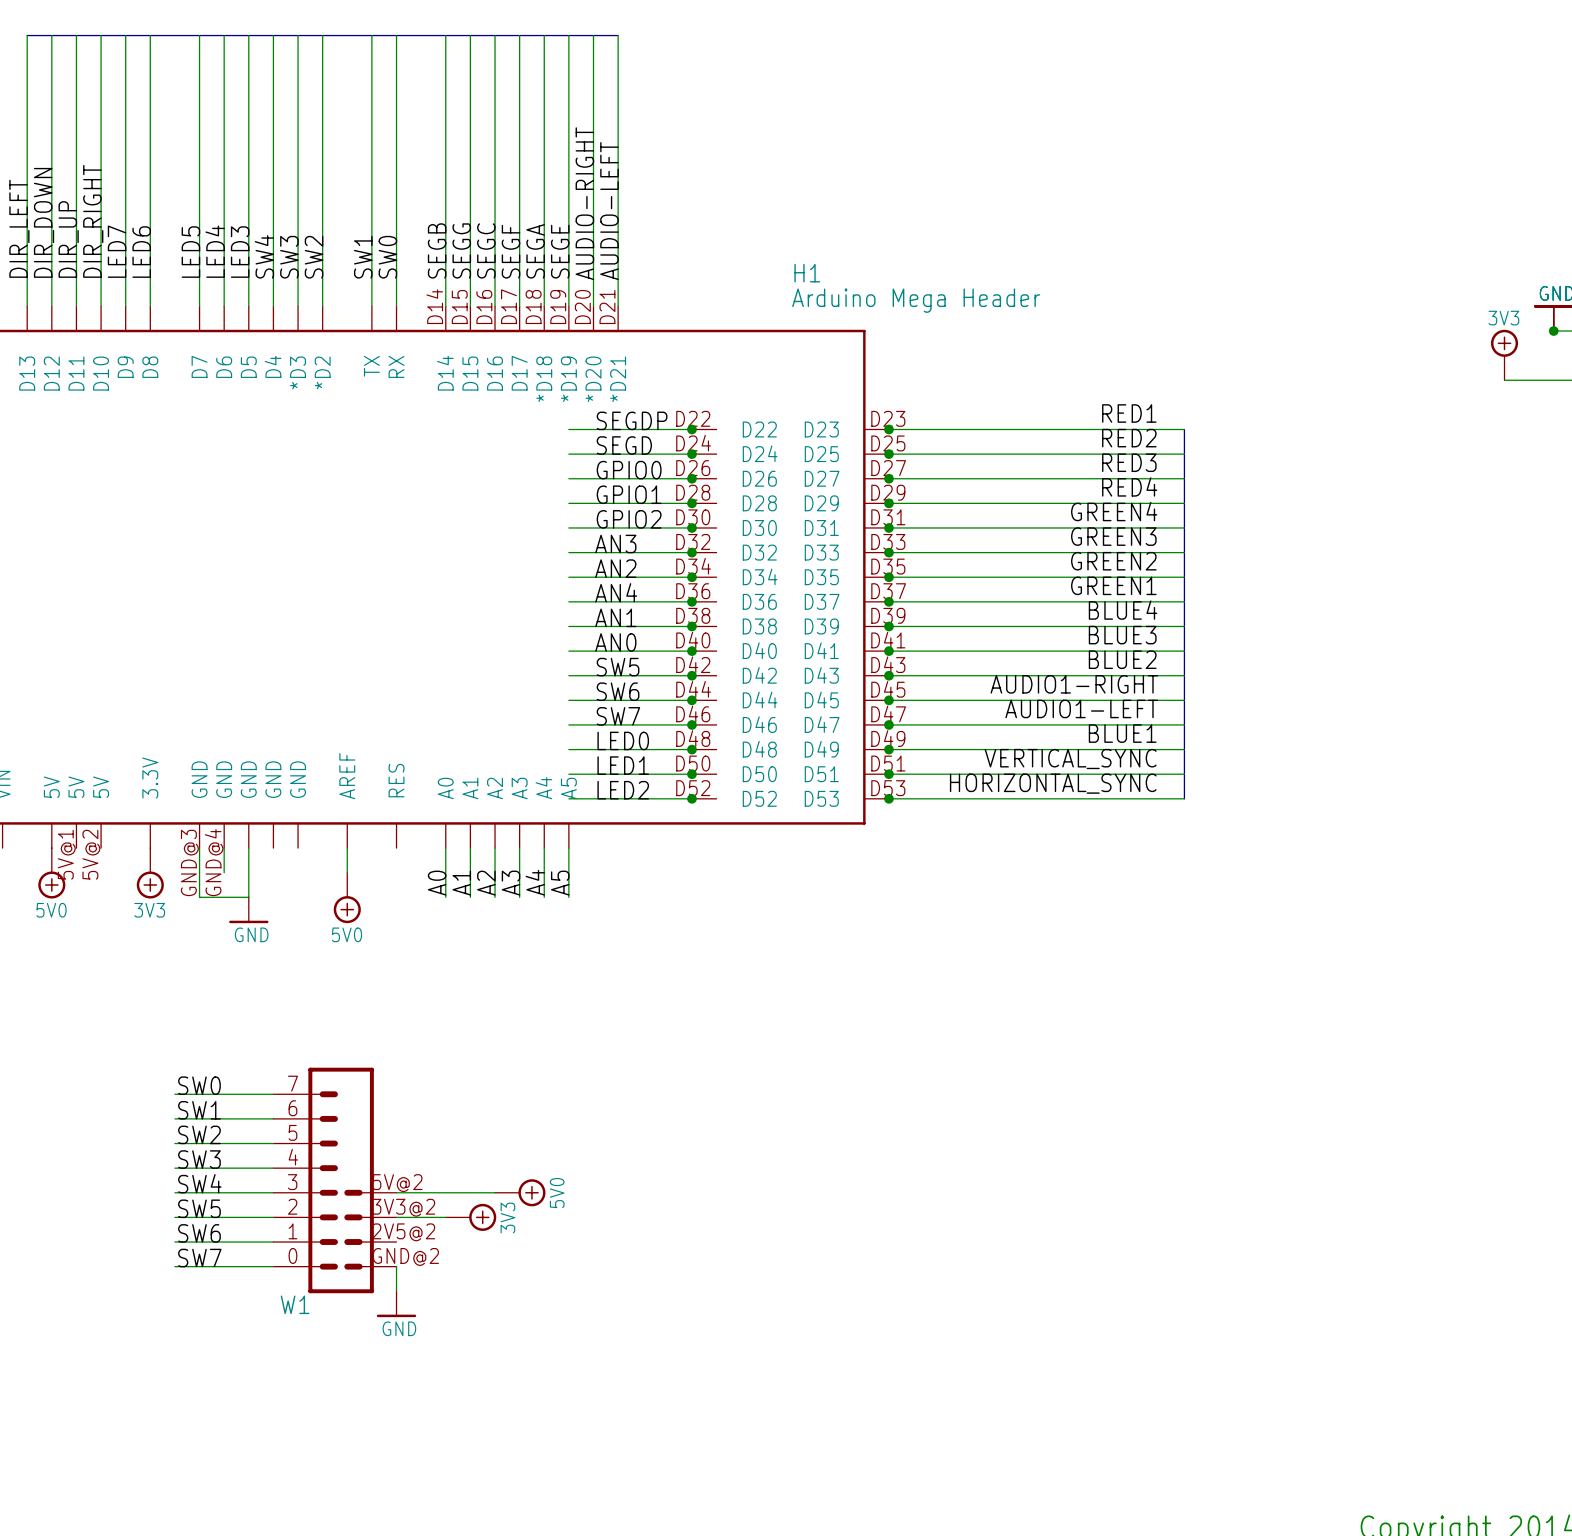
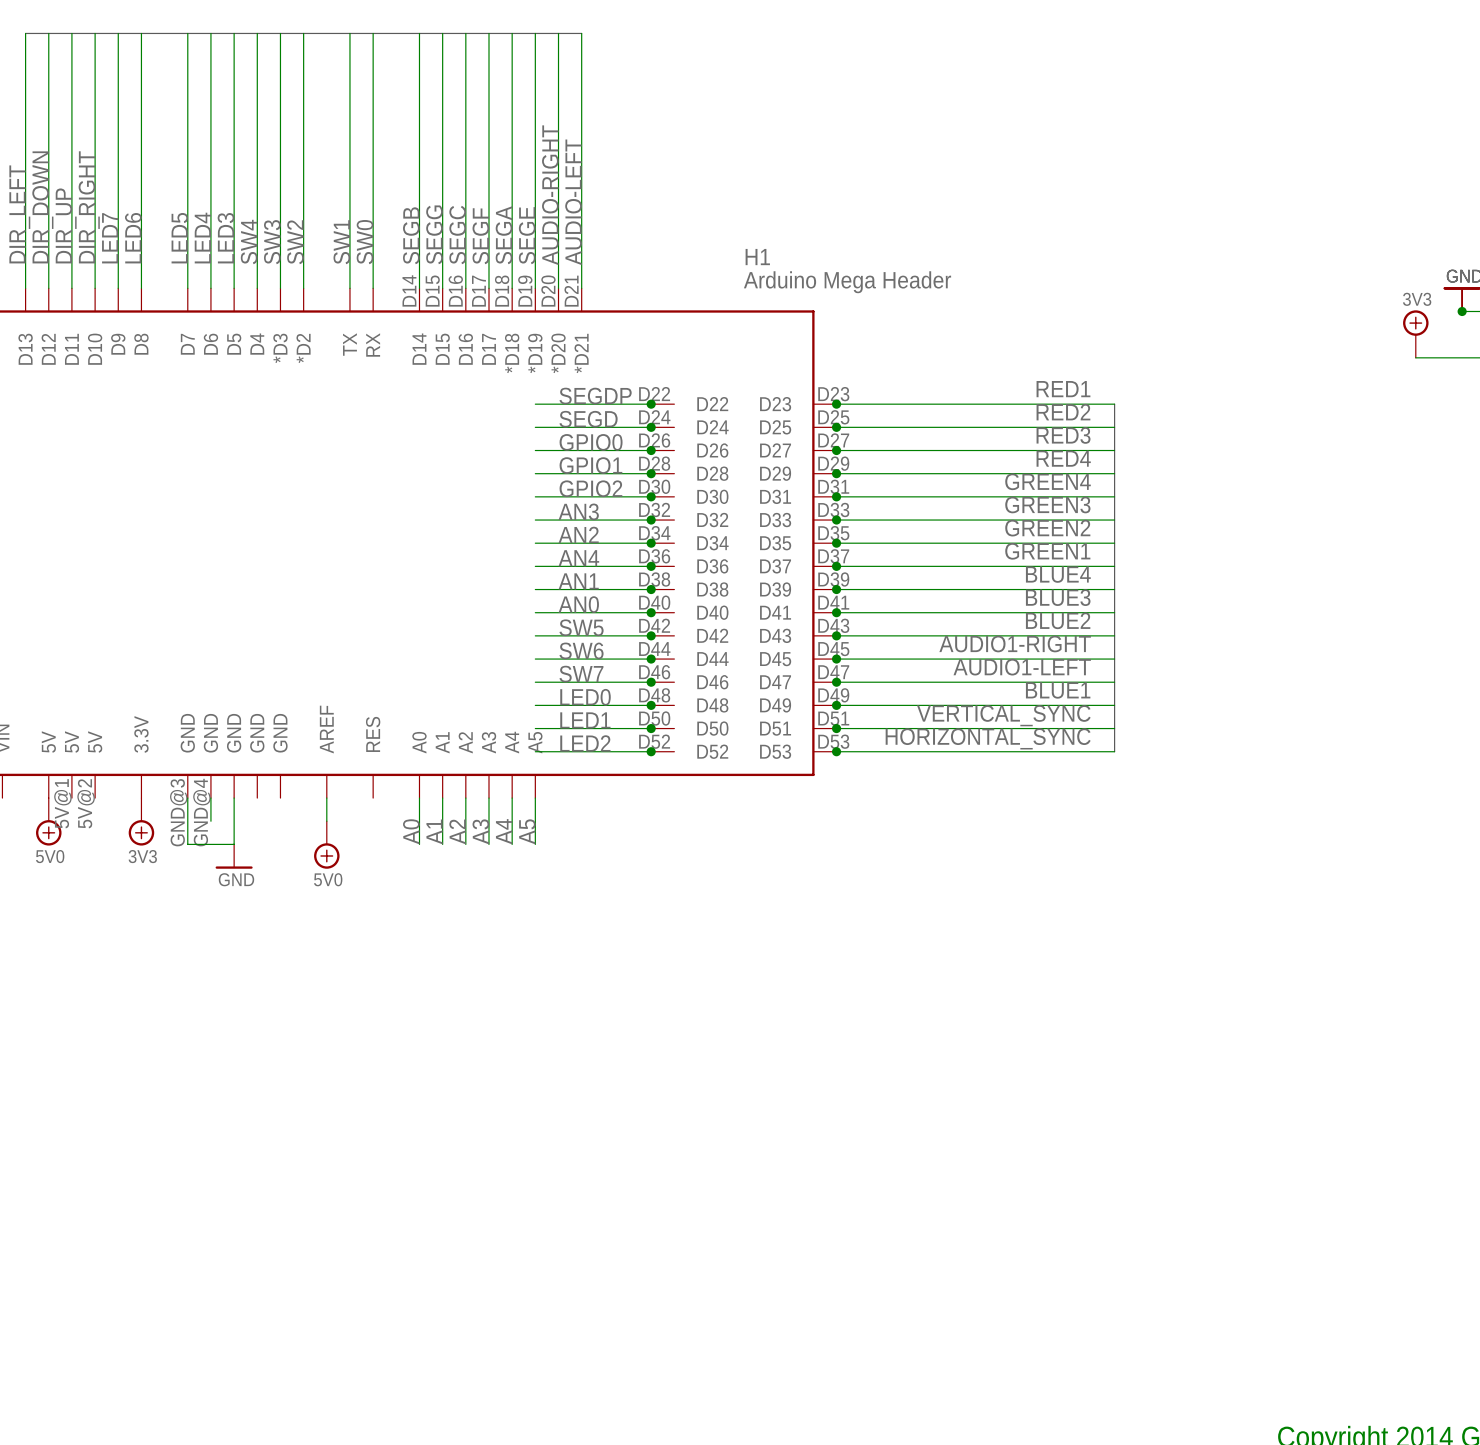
label: SW0 (199, 1085) -> none
wire: (174, 1094) (273, 1094) -> none
label: SW1 (199, 1110) -> none
wire: (174, 1118) (273, 1118) -> none
label: SW2 (199, 1134) -> none
wire: (174, 1143) (273, 1143) -> none
label: SW3 (199, 1159) -> none
wire: (174, 1168) (273, 1168) -> none
W1: (334, 1180) -> none
label: SW4 (199, 1183) -> none
wire: (174, 1192) (273, 1192) -> none
wire: (396, 1192) (495, 1192) -> none
power symbol: 5V0 (520, 1192) -> none
label: SW5 (199, 1208) -> none
wire: (174, 1217) (273, 1217) -> none
wire: (396, 1217) (445, 1217) -> none
power symbol: 3V3 (471, 1217) -> none
label: SW6 (199, 1233) -> none
wire: (174, 1242) (273, 1242) -> none
label: SW7 (199, 1258) -> none
wire: (174, 1266) (273, 1266) -> none
wire: (396, 1266) (396, 1291) -> none
power symbol: GND (396, 1304) -> none

